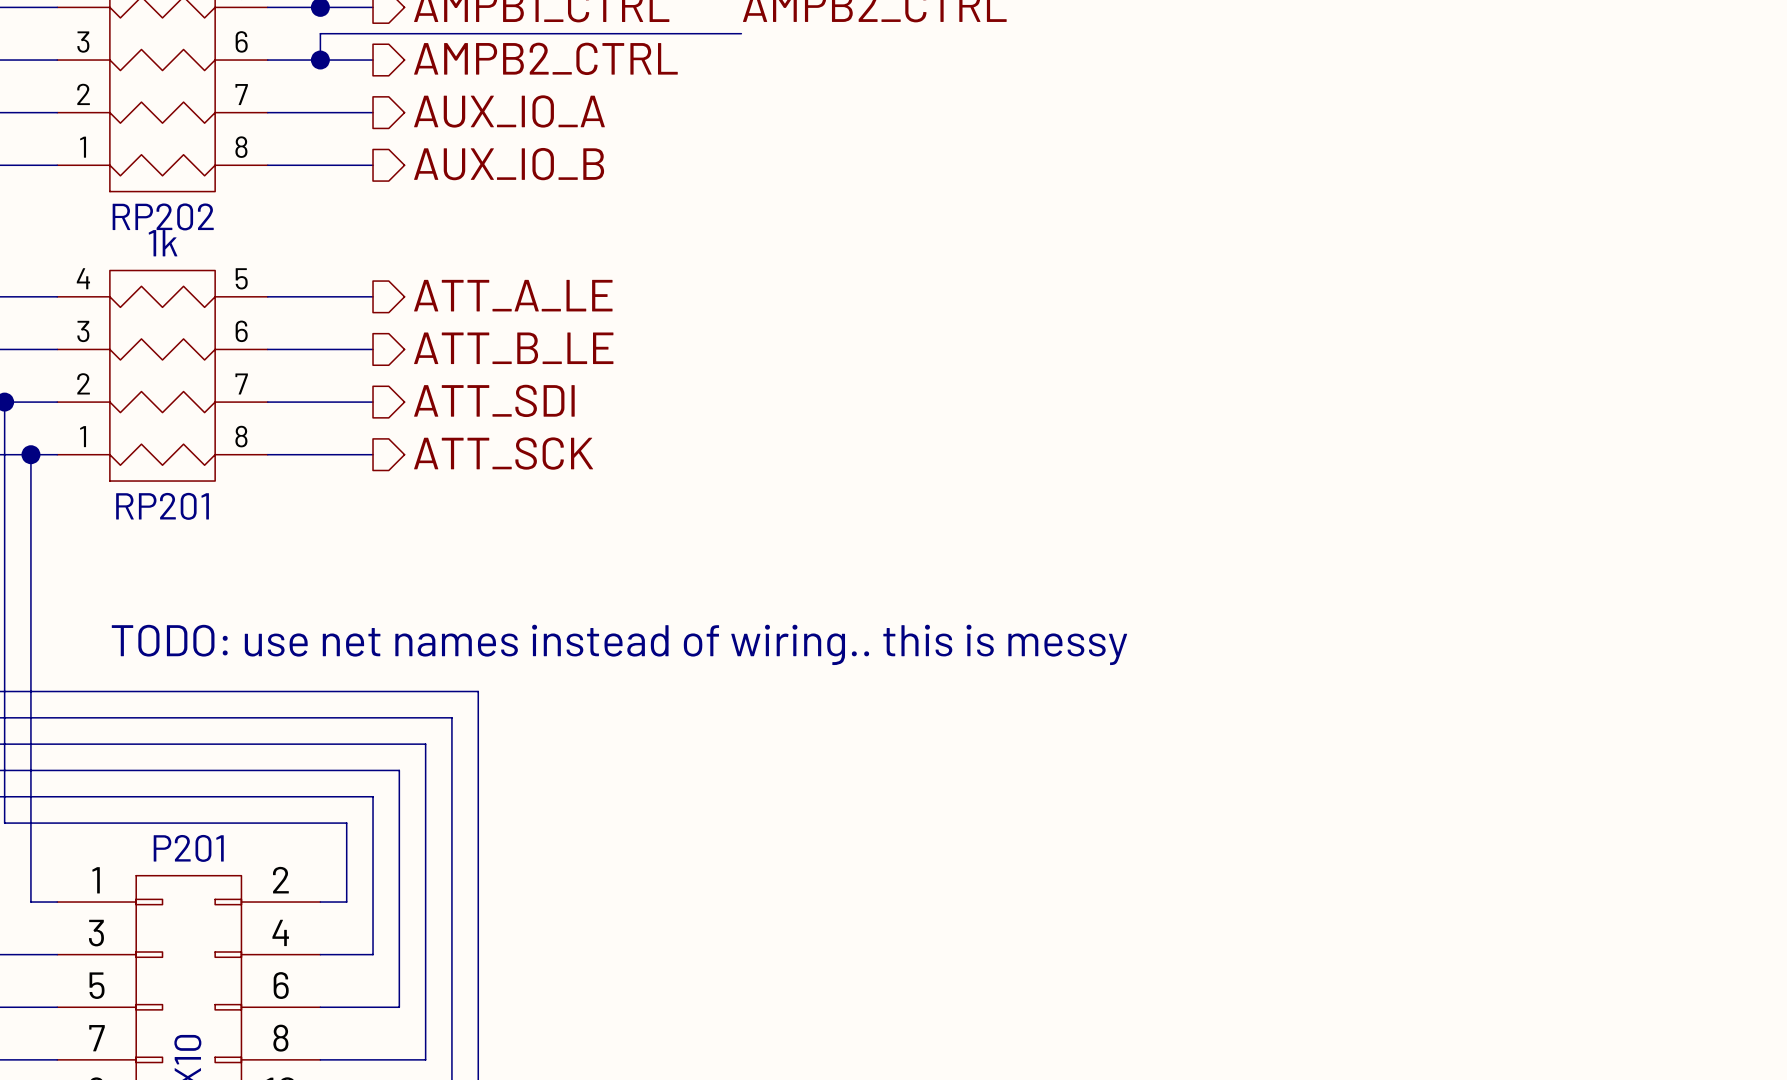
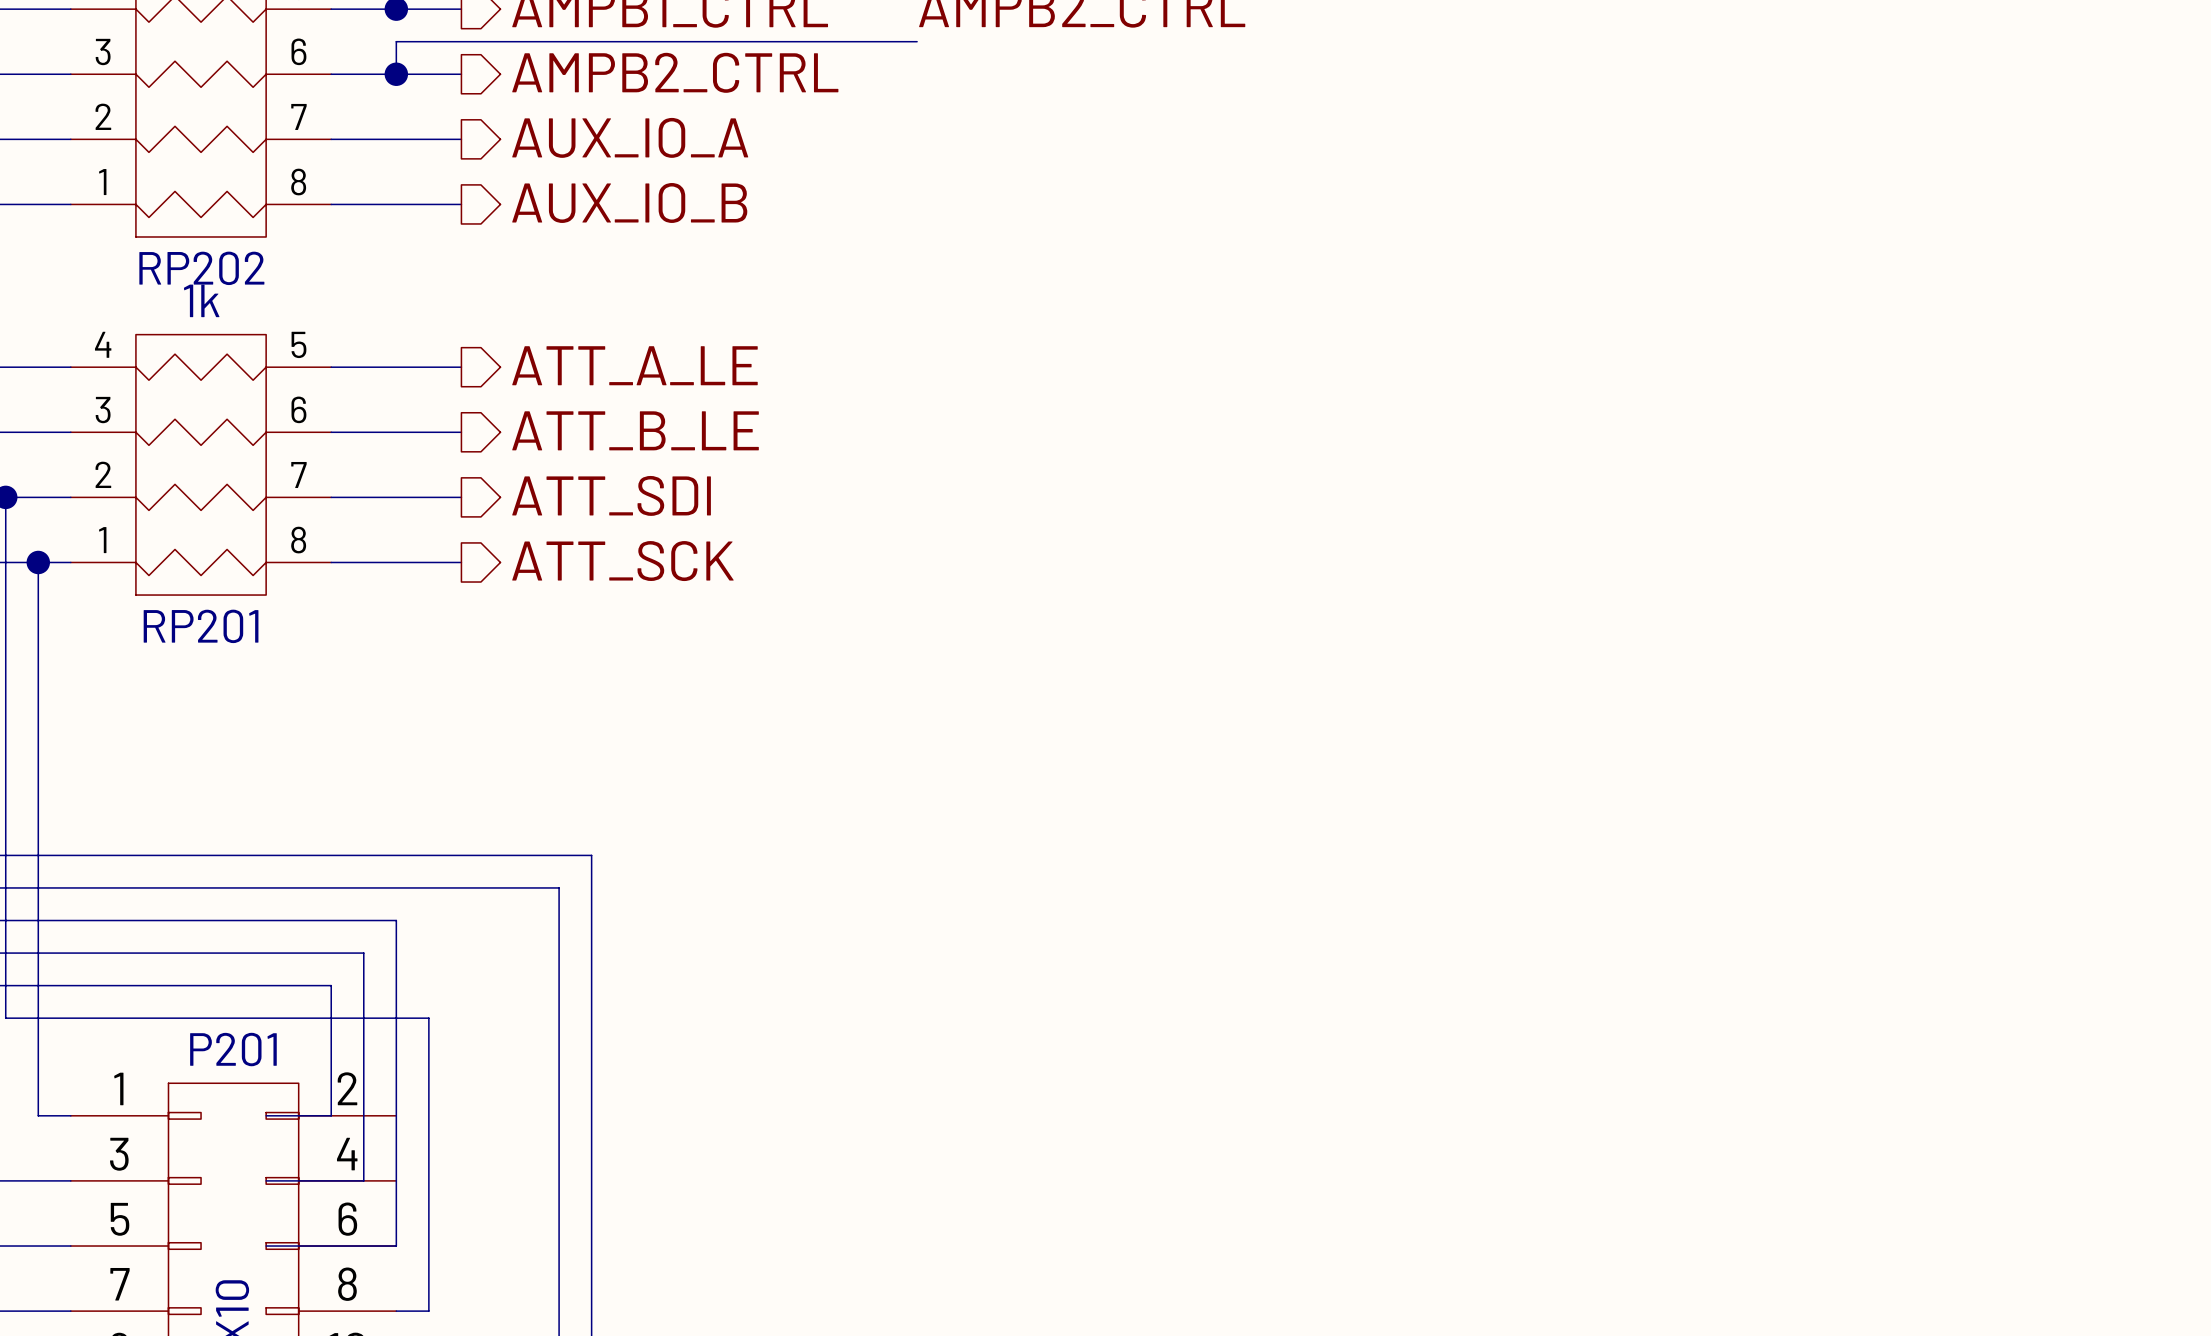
text: TODO: use net names instead of wiring.. this is messy (619, 644) -> none
wire: (320, 744) (425, 744) (425, 1059) (346, 1059) -> (396, 920) (396, 1246) (266, 1246)
wire: (294, 770) (399, 770) (399, 1007) (320, 1007) -> (363, 953) (363, 1180) (266, 1180)
wire: (267, 796) (373, 796) (373, 954) (320, 954) -> (331, 985) (331, 1115) (266, 1115)
wire: (320, 902) (346, 902) -> (428, 1311) (428, 1115)

